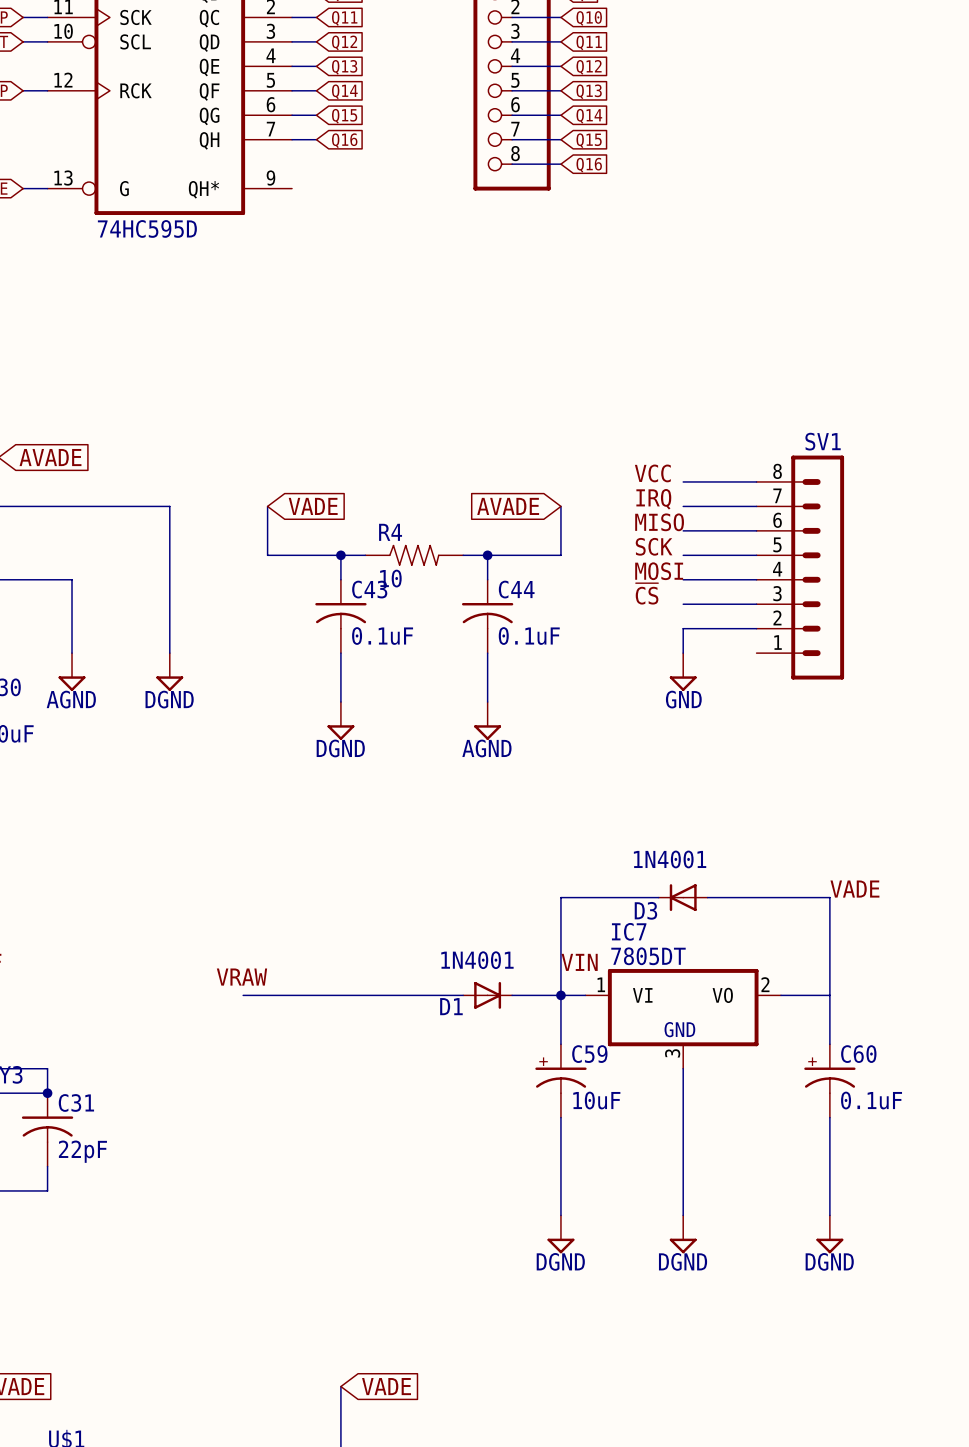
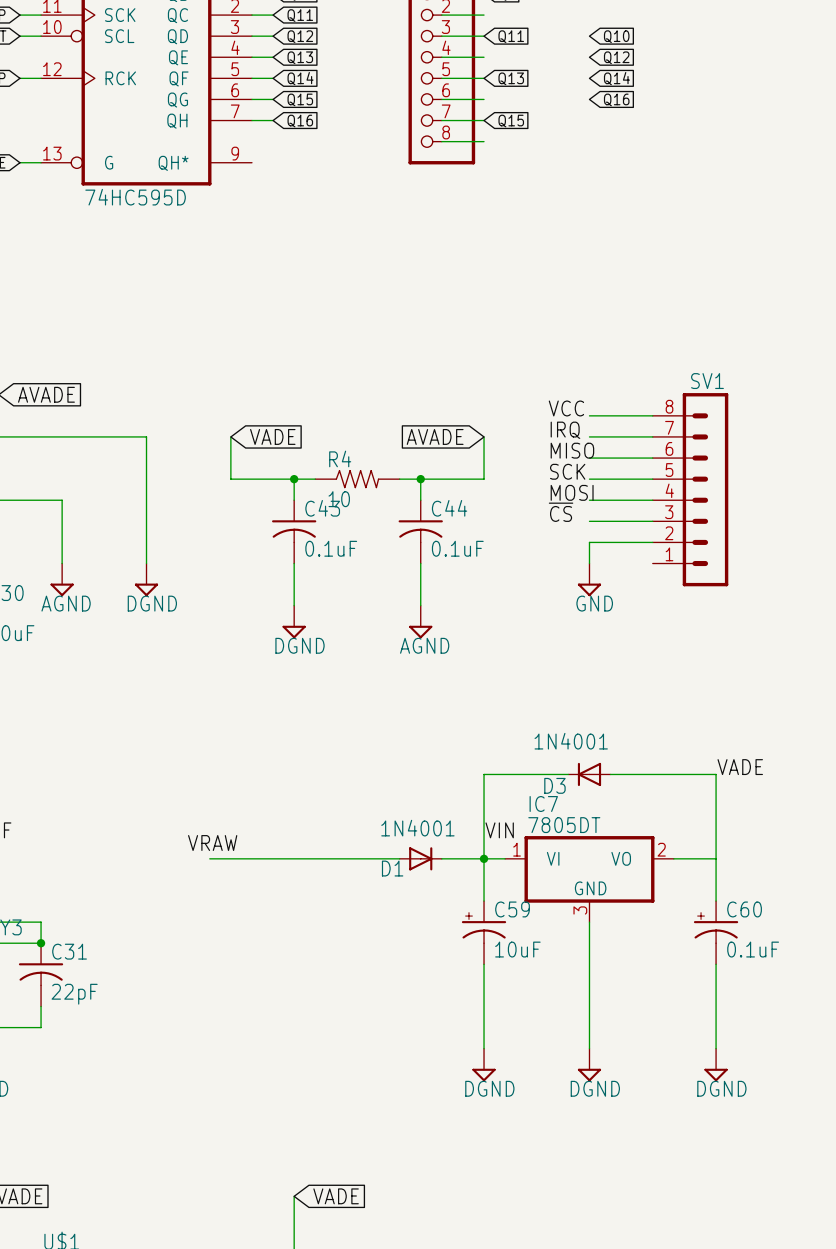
global label position: Q10 (589, 18) -> Q10 (616, 36)
global label position: Q12 (589, 67) -> Q12 (616, 57)
global label position: Q14 (589, 116) -> Q14 (616, 78)
global label position: Q16 (589, 165) -> Q16 (616, 99)

